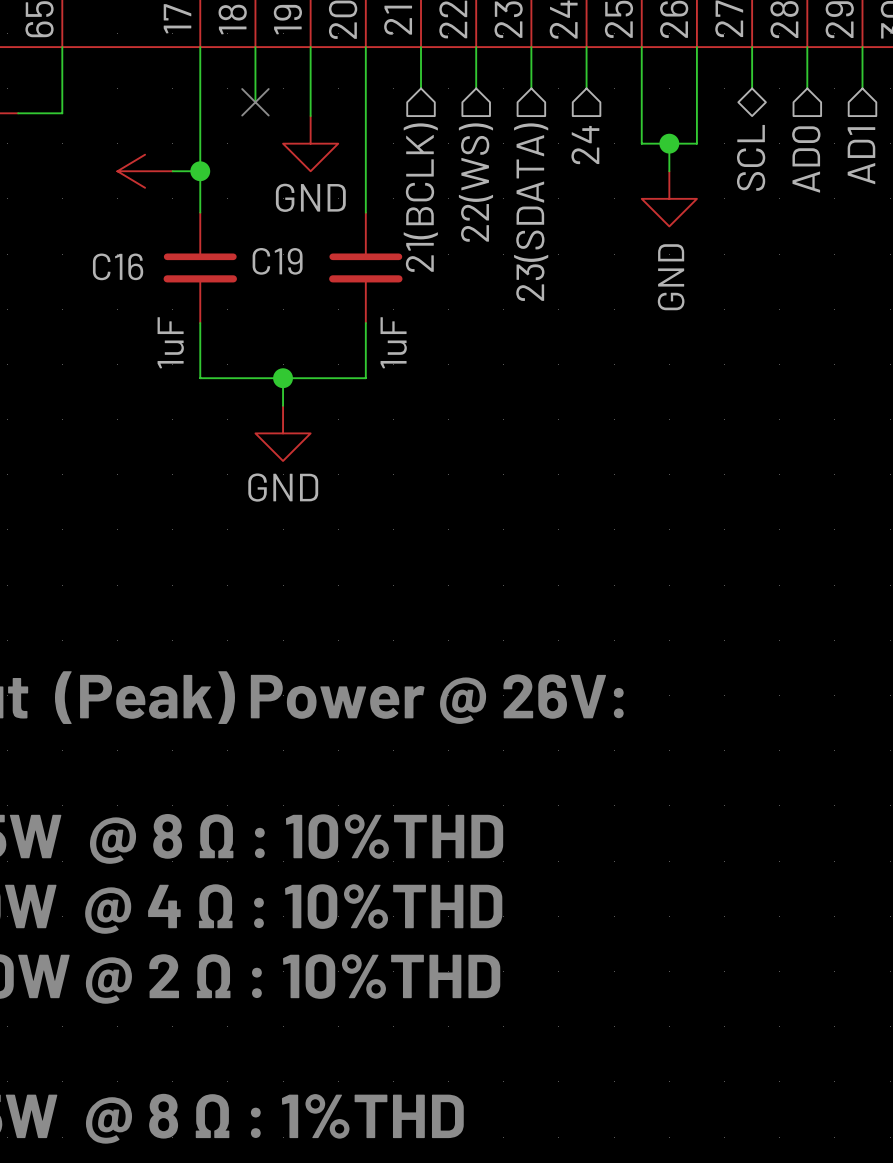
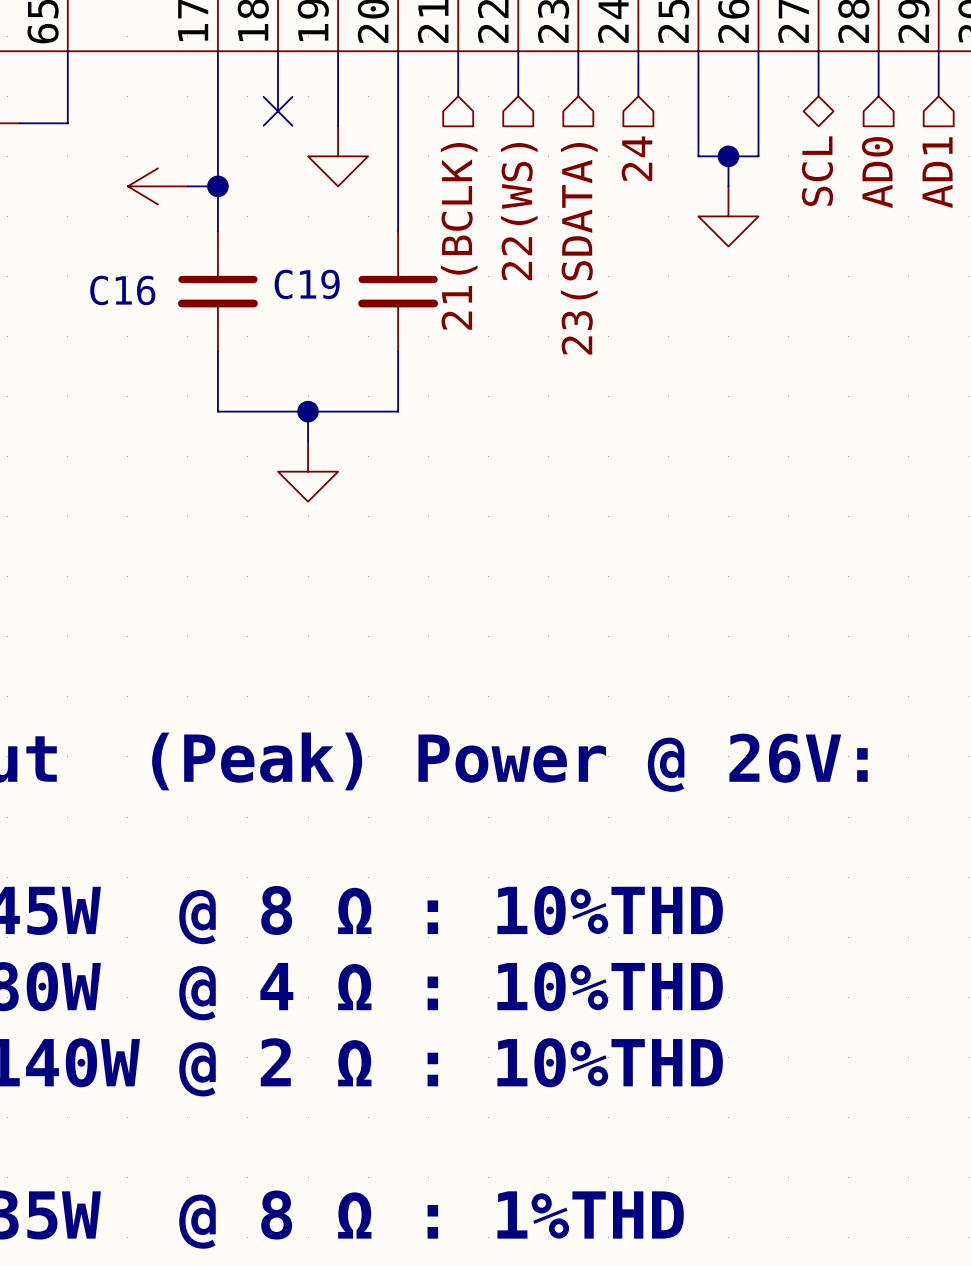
power symbol text: GND (310, 197) -> none
power symbol text: GND (671, 277) -> none
C16 value: 1uF (170, 342) -> none
C19 value: 1uF (393, 342) -> none
power symbol text: GND (283, 487) -> none

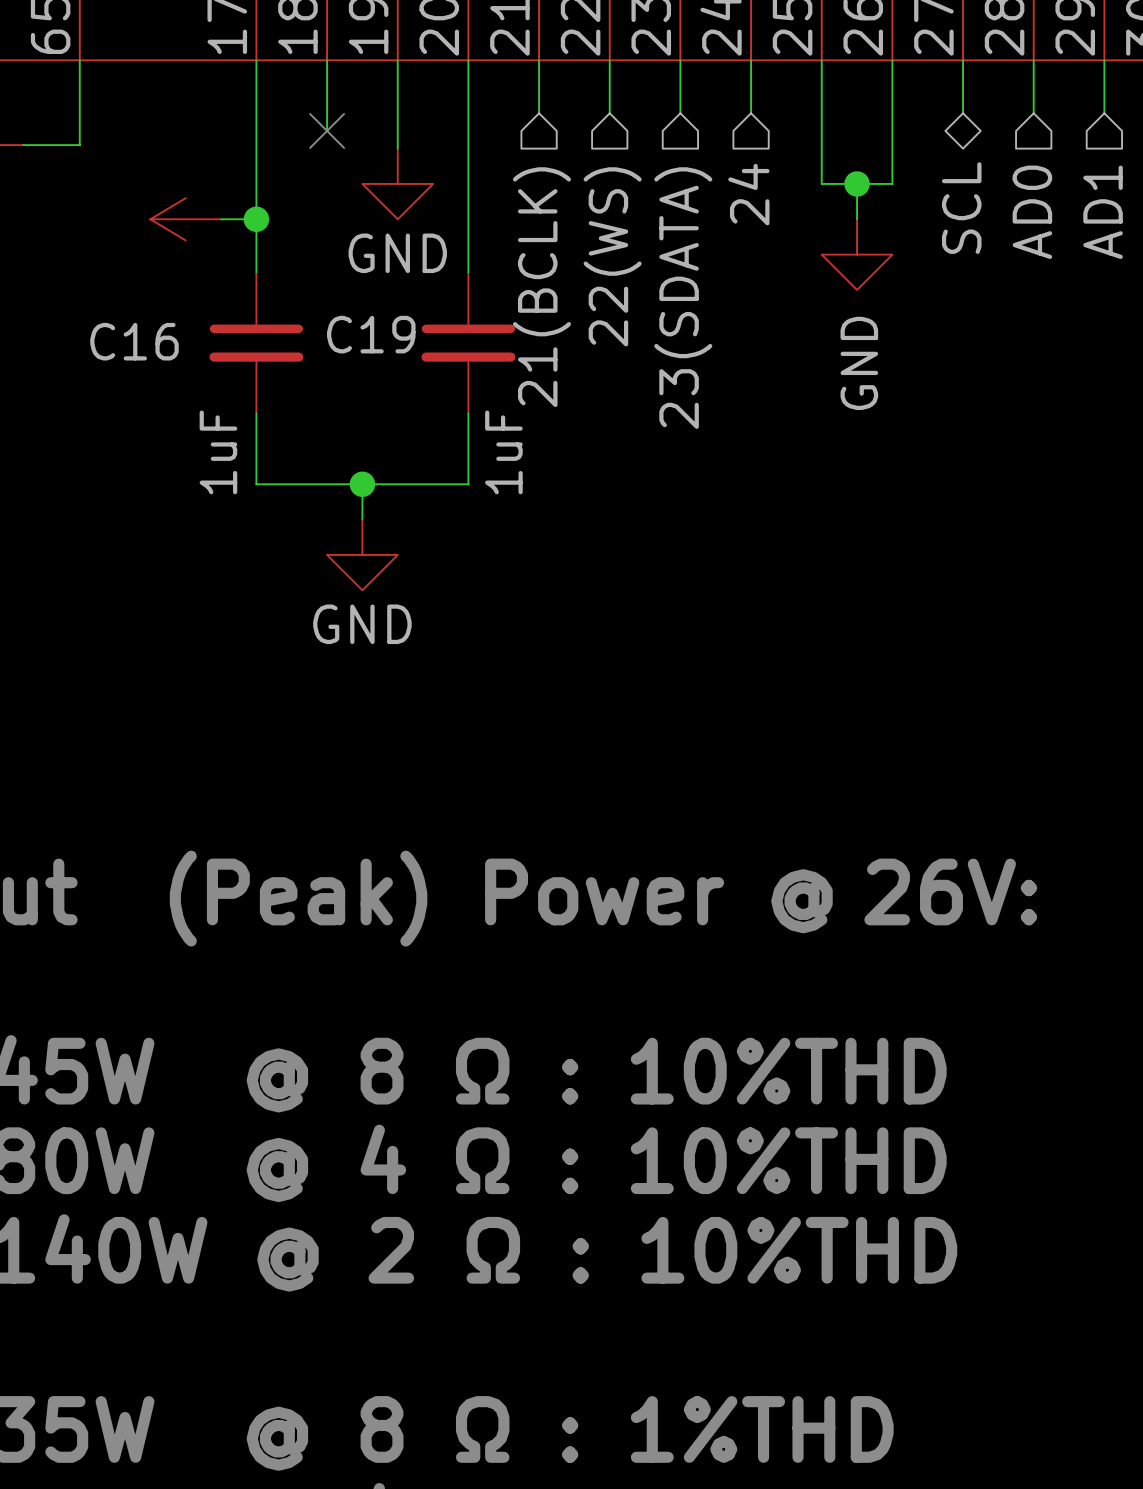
power symbol text: none -> GND (397, 253)
power symbol text: none -> GND (859, 363)
C16 value: none -> 1uF (218, 452)
C19 value: none -> 1uF (503, 452)
power symbol text: none -> GND (362, 624)

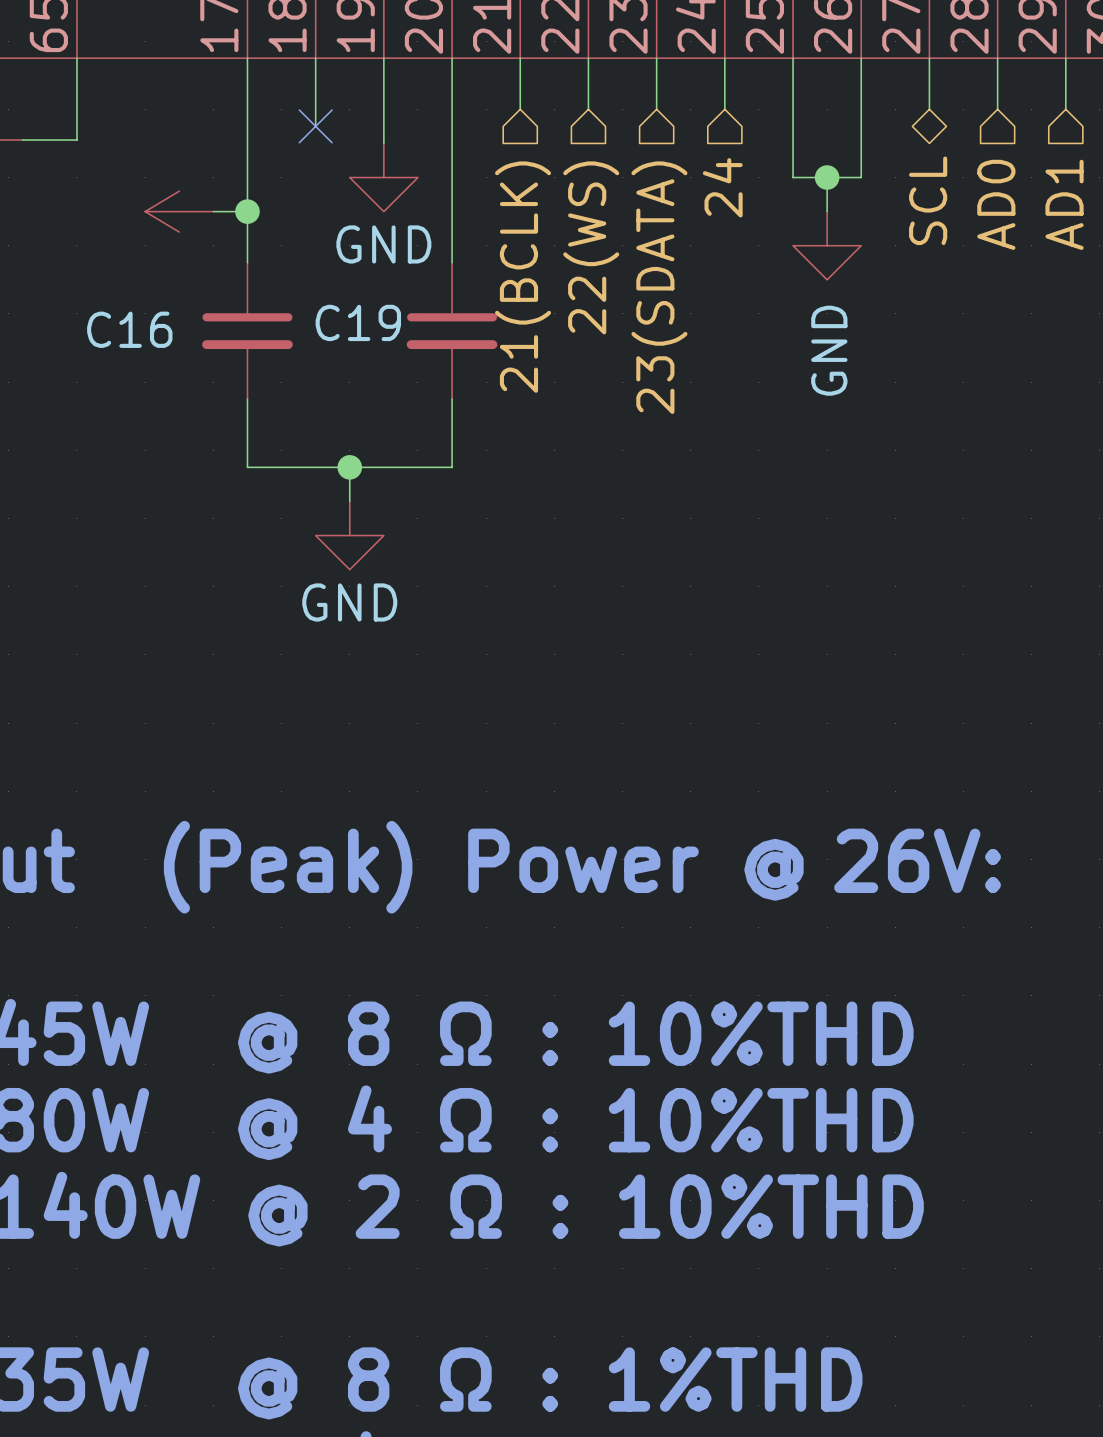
C16 value: 1uF (218, 452) -> none
C19 value: 1uF (503, 452) -> none

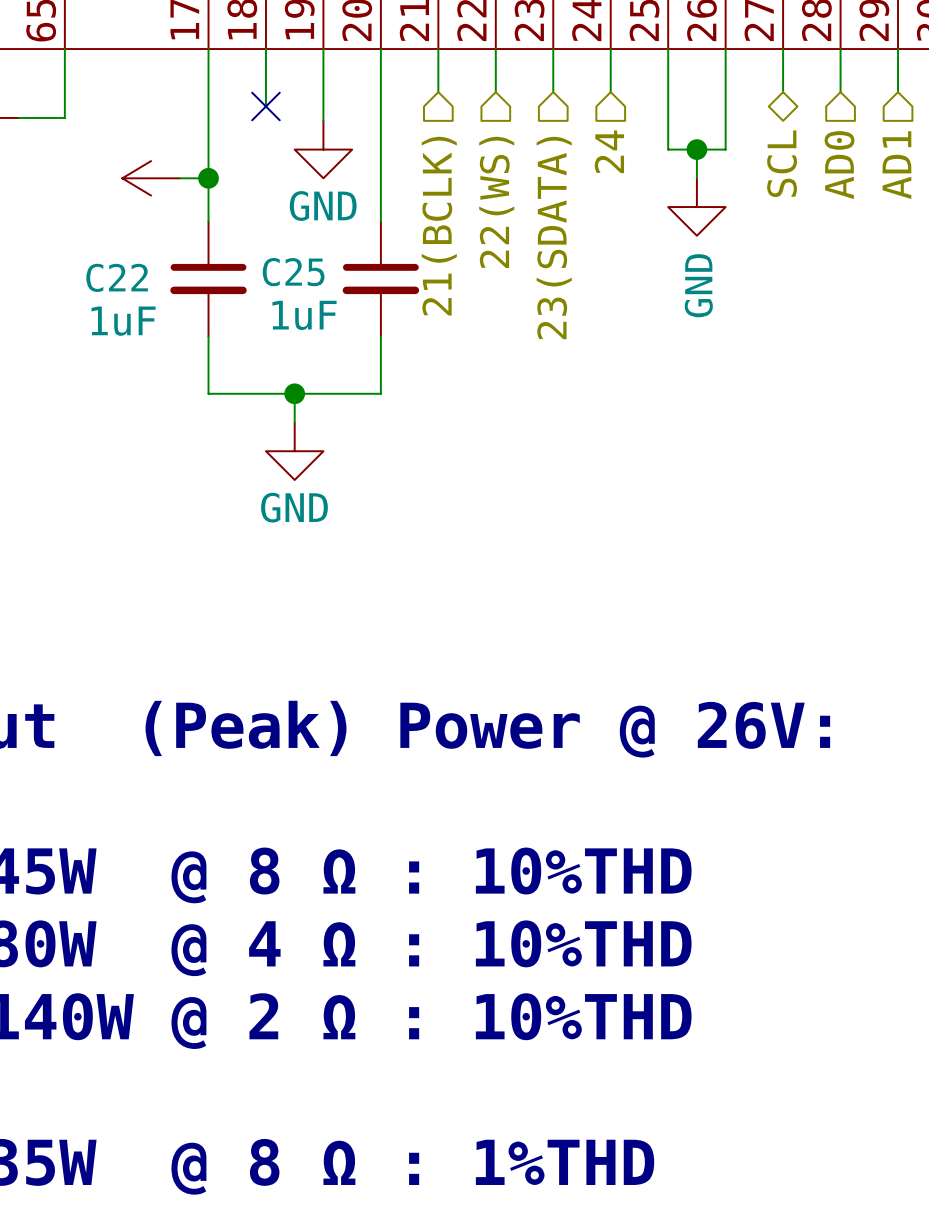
C19 name: C19 (358, 322) -> C25 (293, 272)
C16 name: C16 (129, 329) -> C22 (117, 277)
C19 text: none -> 1uF (304, 315)
C16 text: none -> 1uF (123, 321)

